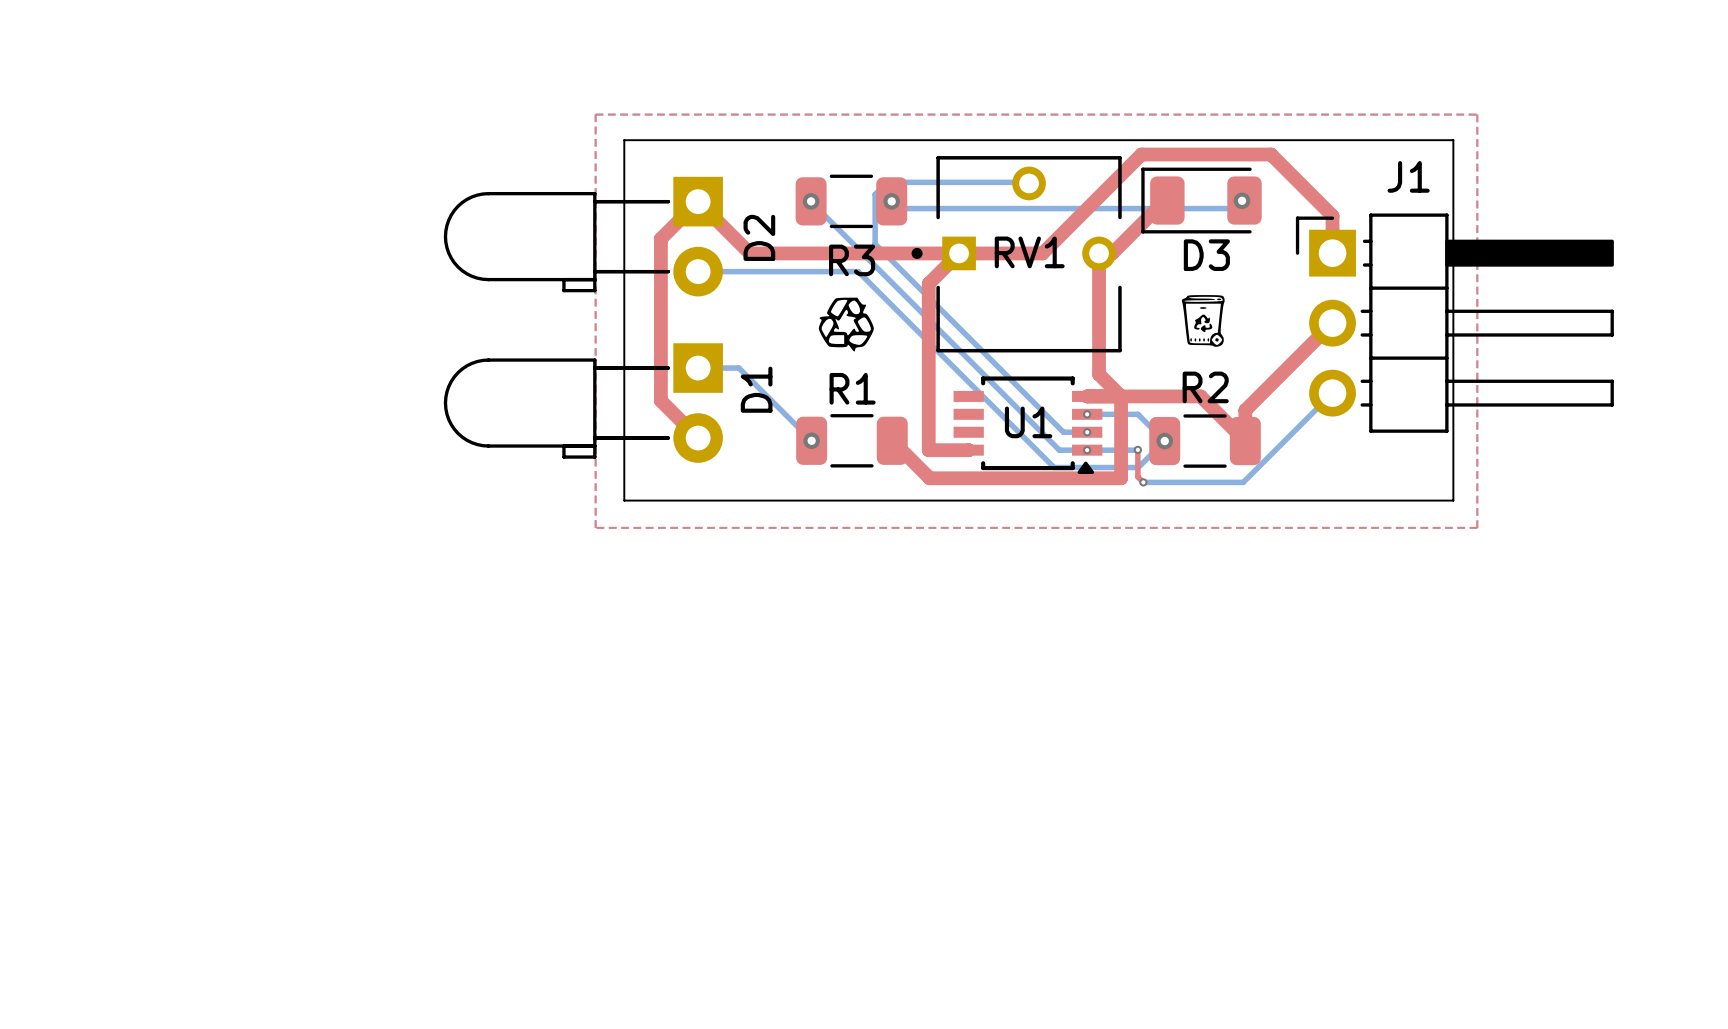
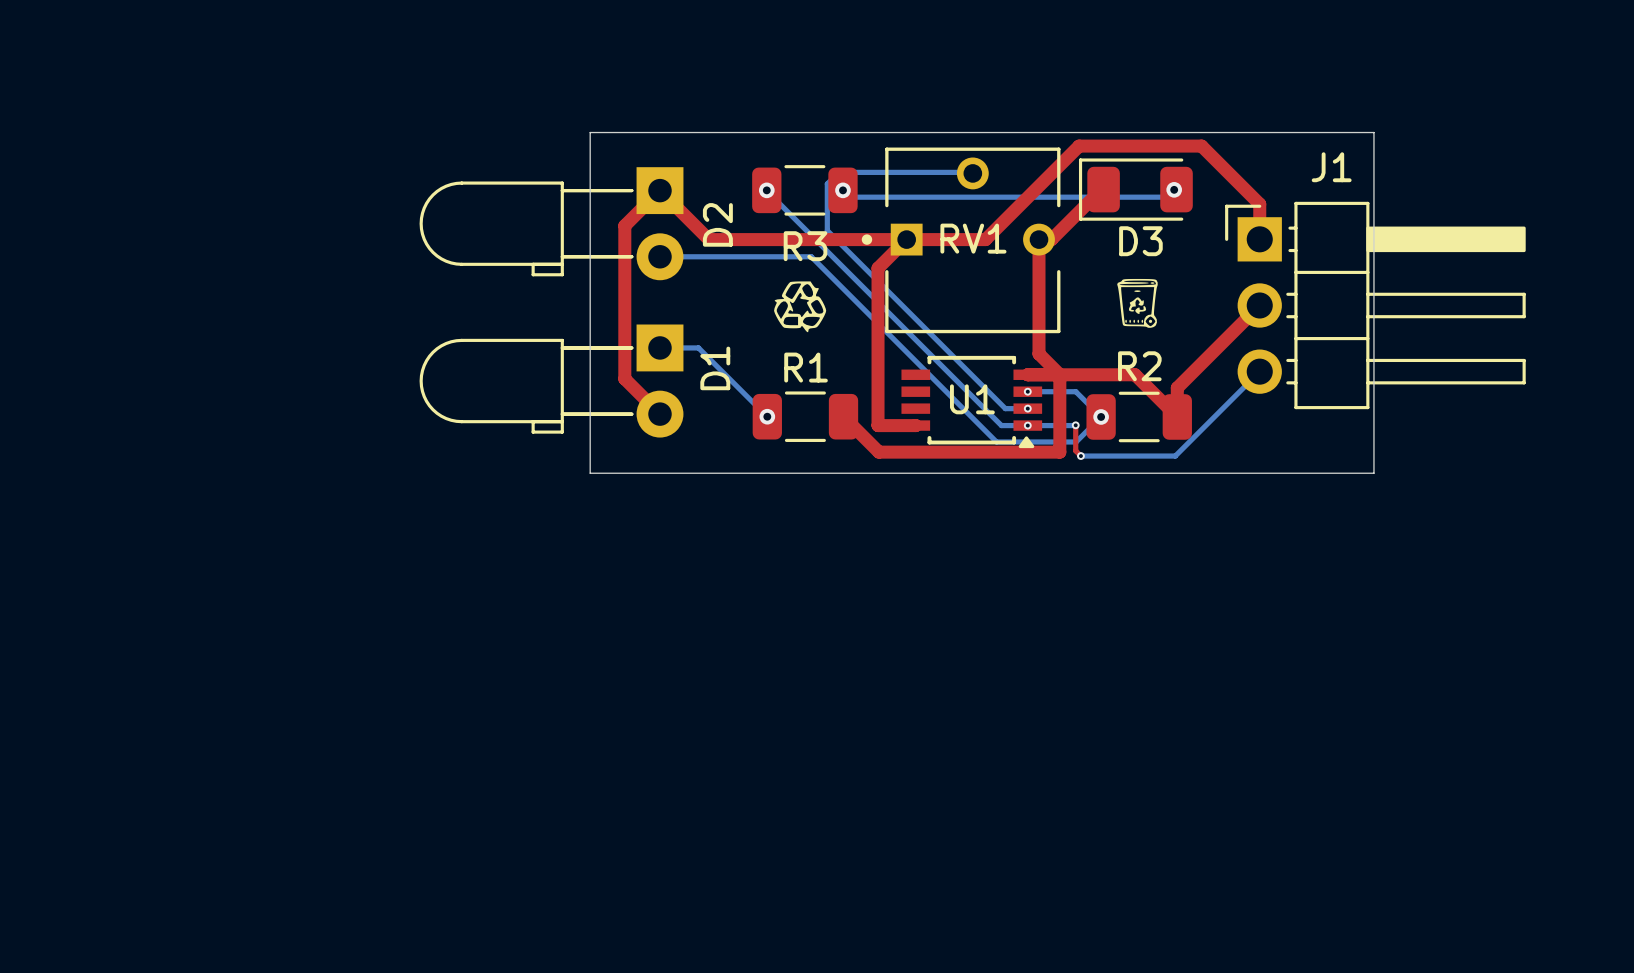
top zone outline: (595, 114) (595, 527) (1477, 527) (1477, 114) (595, 114) -> none

